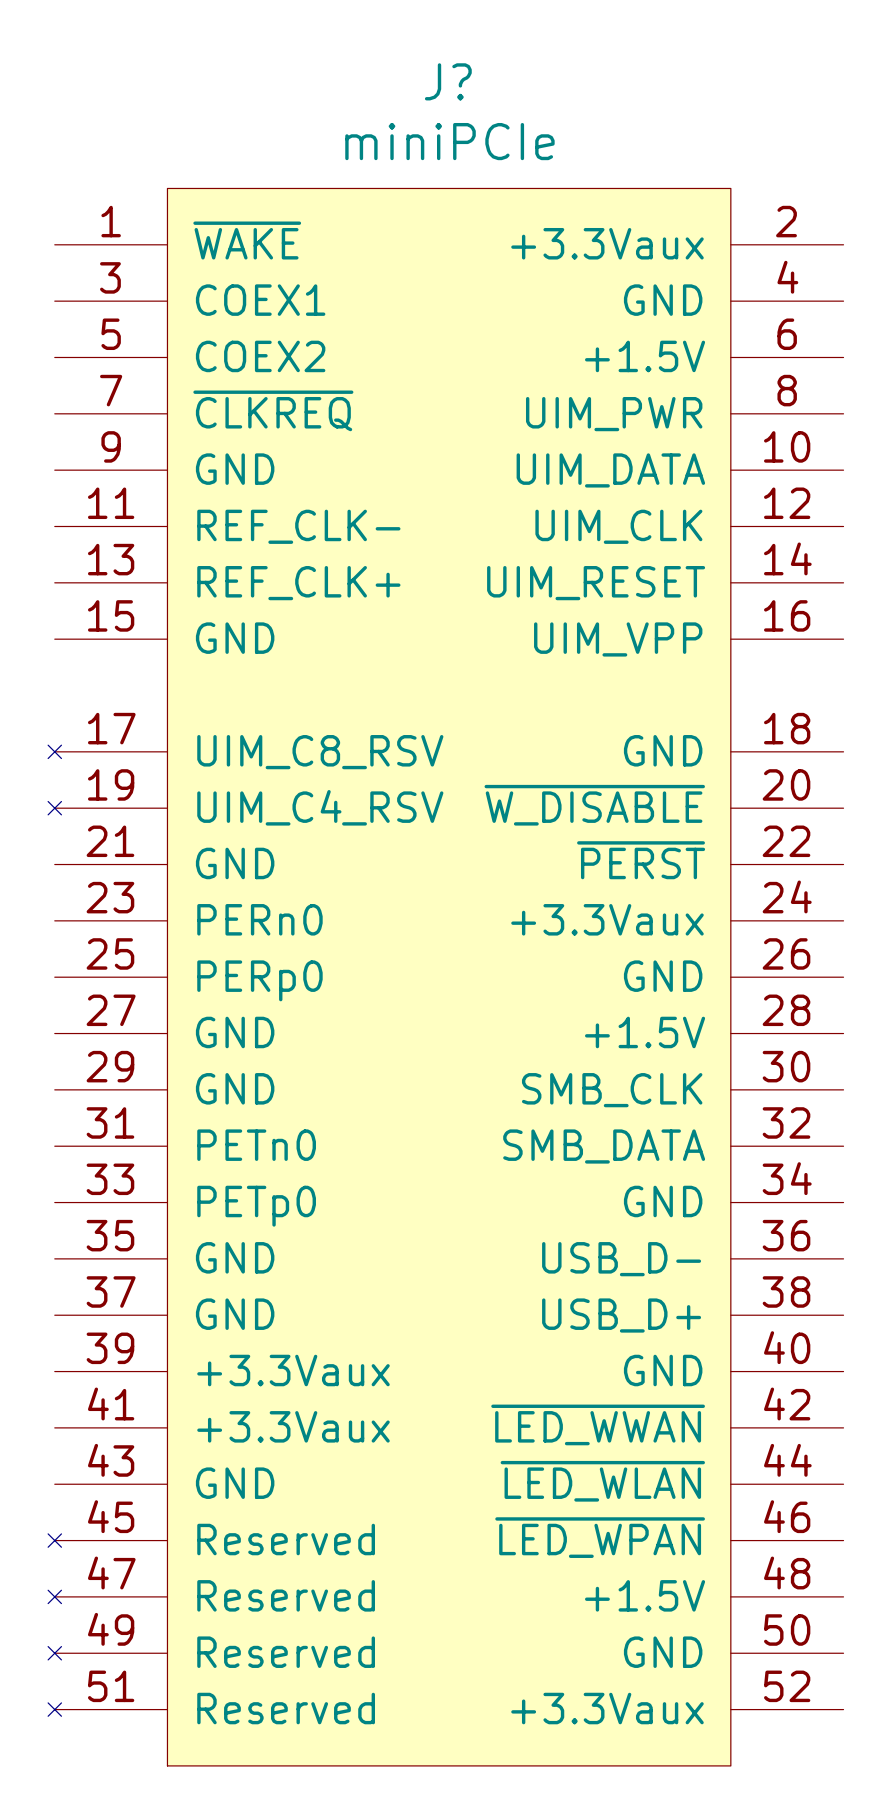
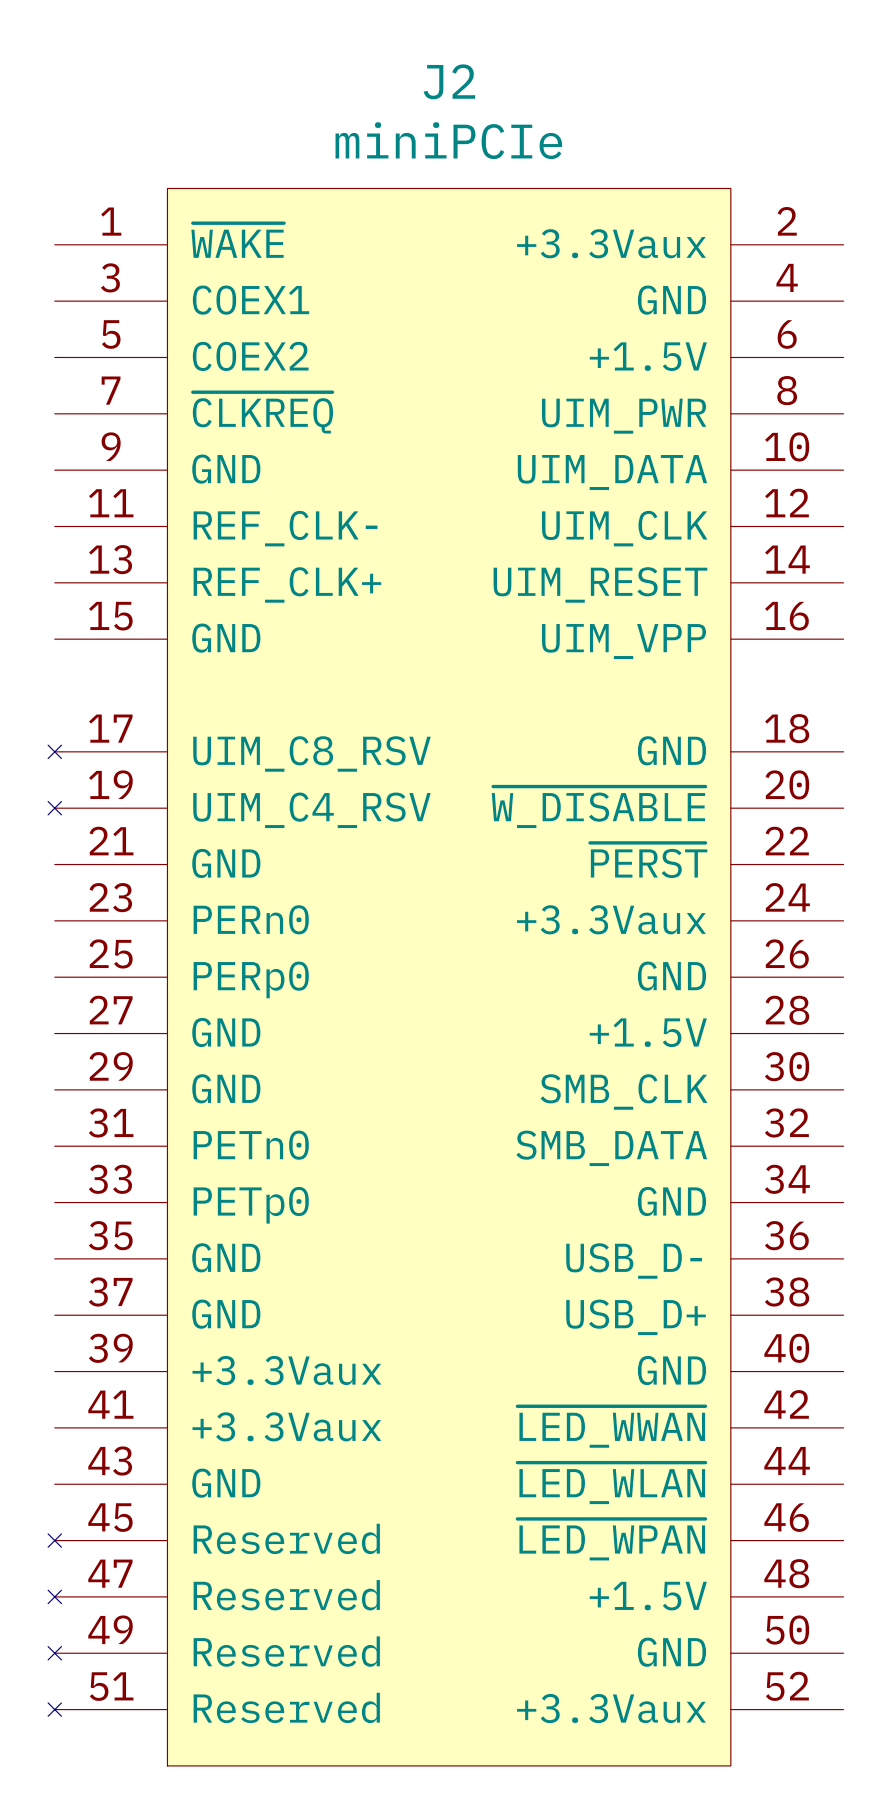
J? name: J? (448, 81) -> J2 (449, 81)

